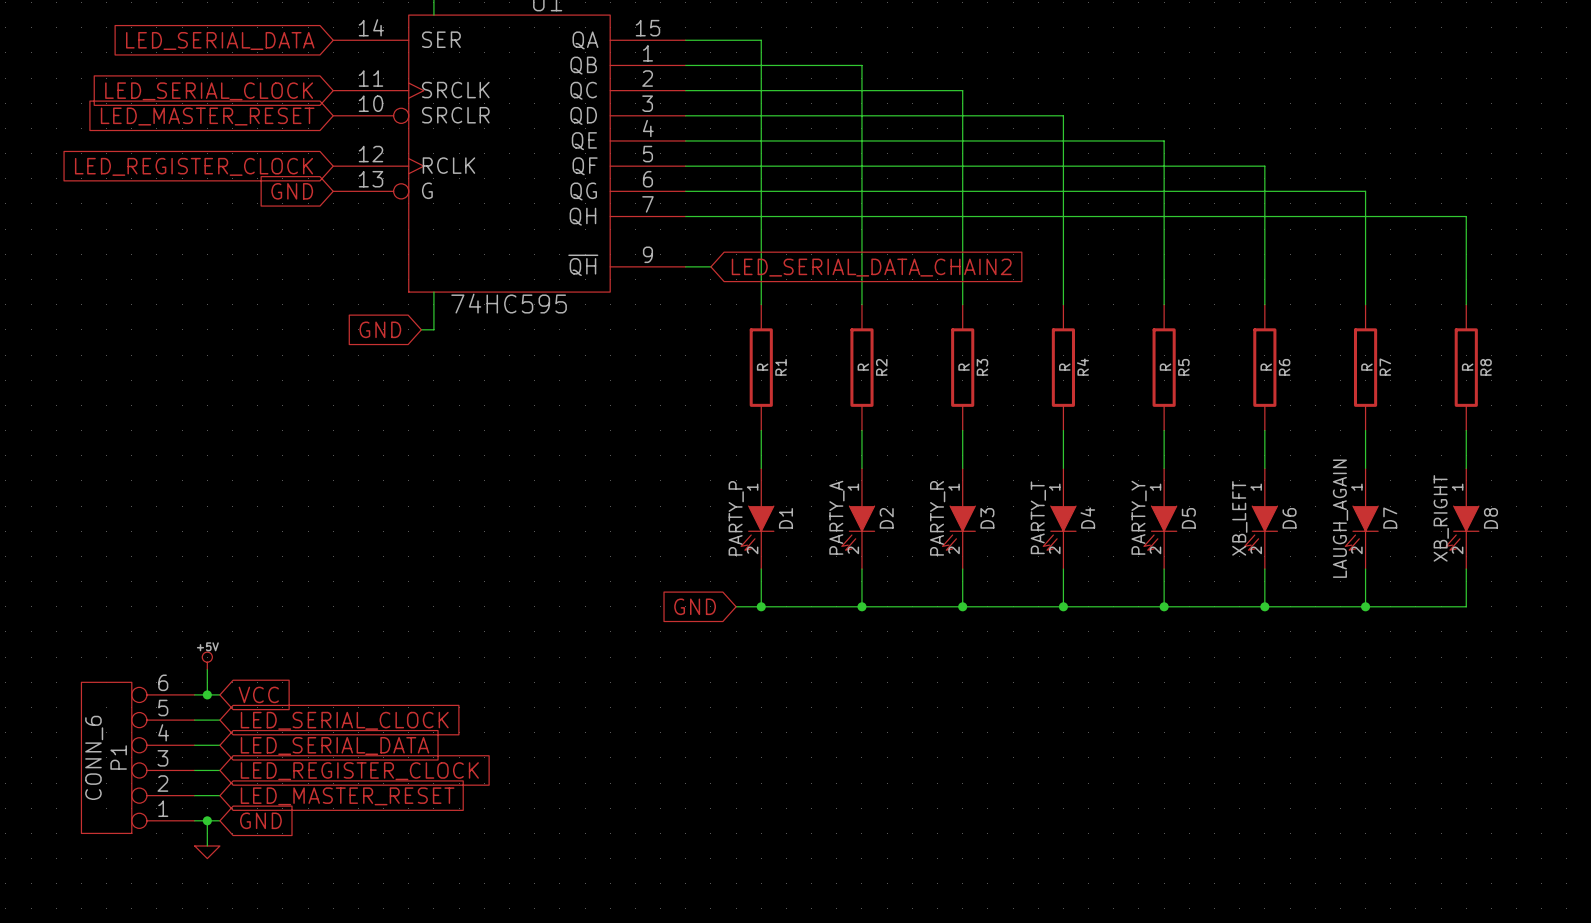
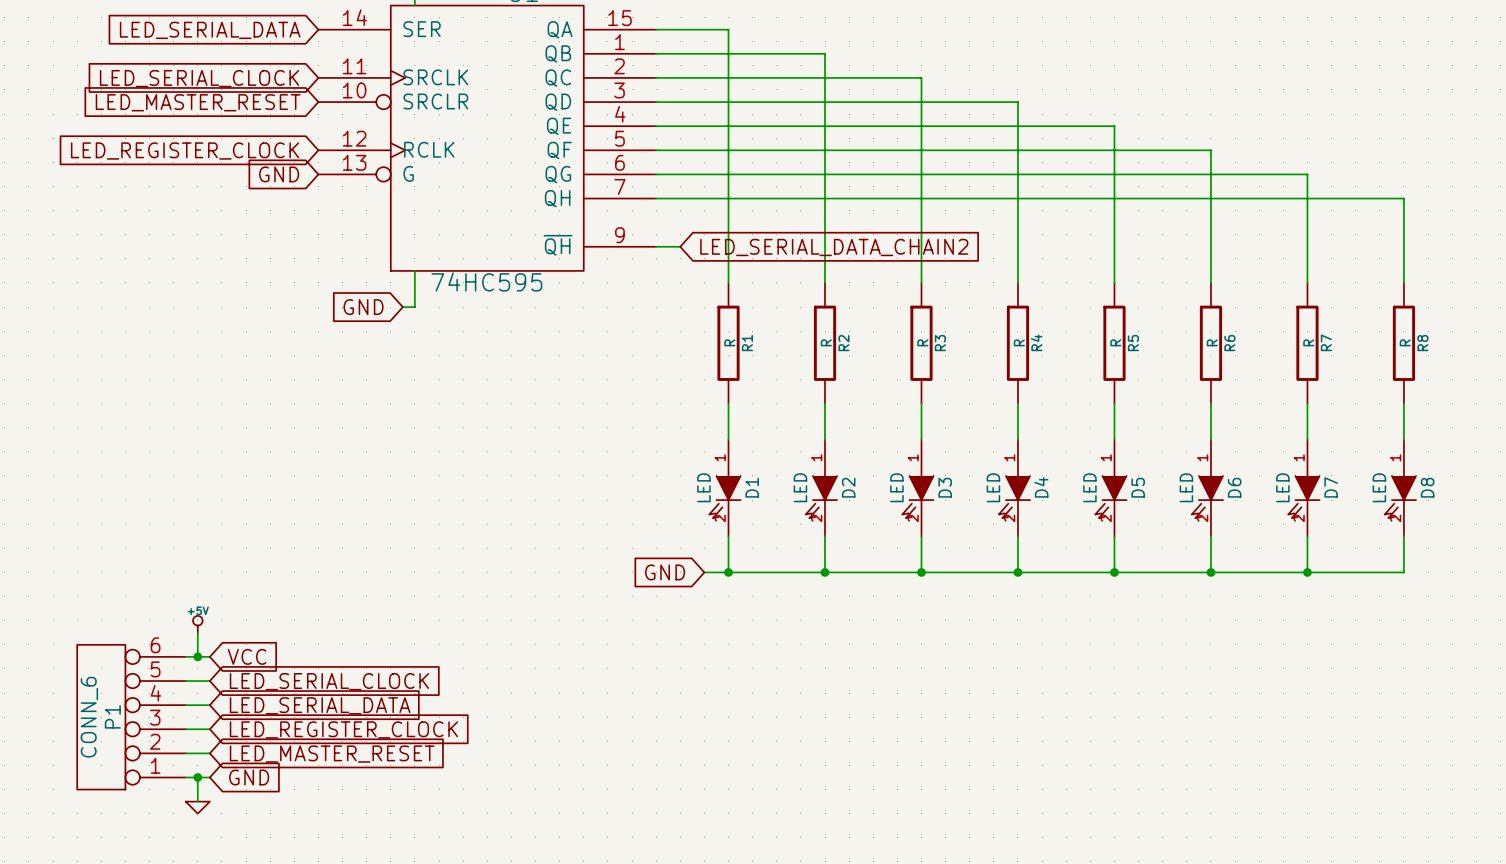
D2 value: PARTY_A (836, 517) -> LED (800, 487)
D4 value: PARTY_T (1038, 517) -> LED (993, 487)
D5 value: PARTY_Y (1139, 517) -> LED (1089, 487)
D1 value: PARTY_P (736, 518) -> LED (703, 487)
D3 value: PARTY_R (937, 518) -> LED (896, 487)
D6 value: XB_LEFT (1239, 518) -> LED (1186, 487)
D7 value: LAUGH_AGAIN (1340, 518) -> LED (1282, 487)
D8 value: XB_RIGHT (1441, 518) -> LED (1379, 487)

